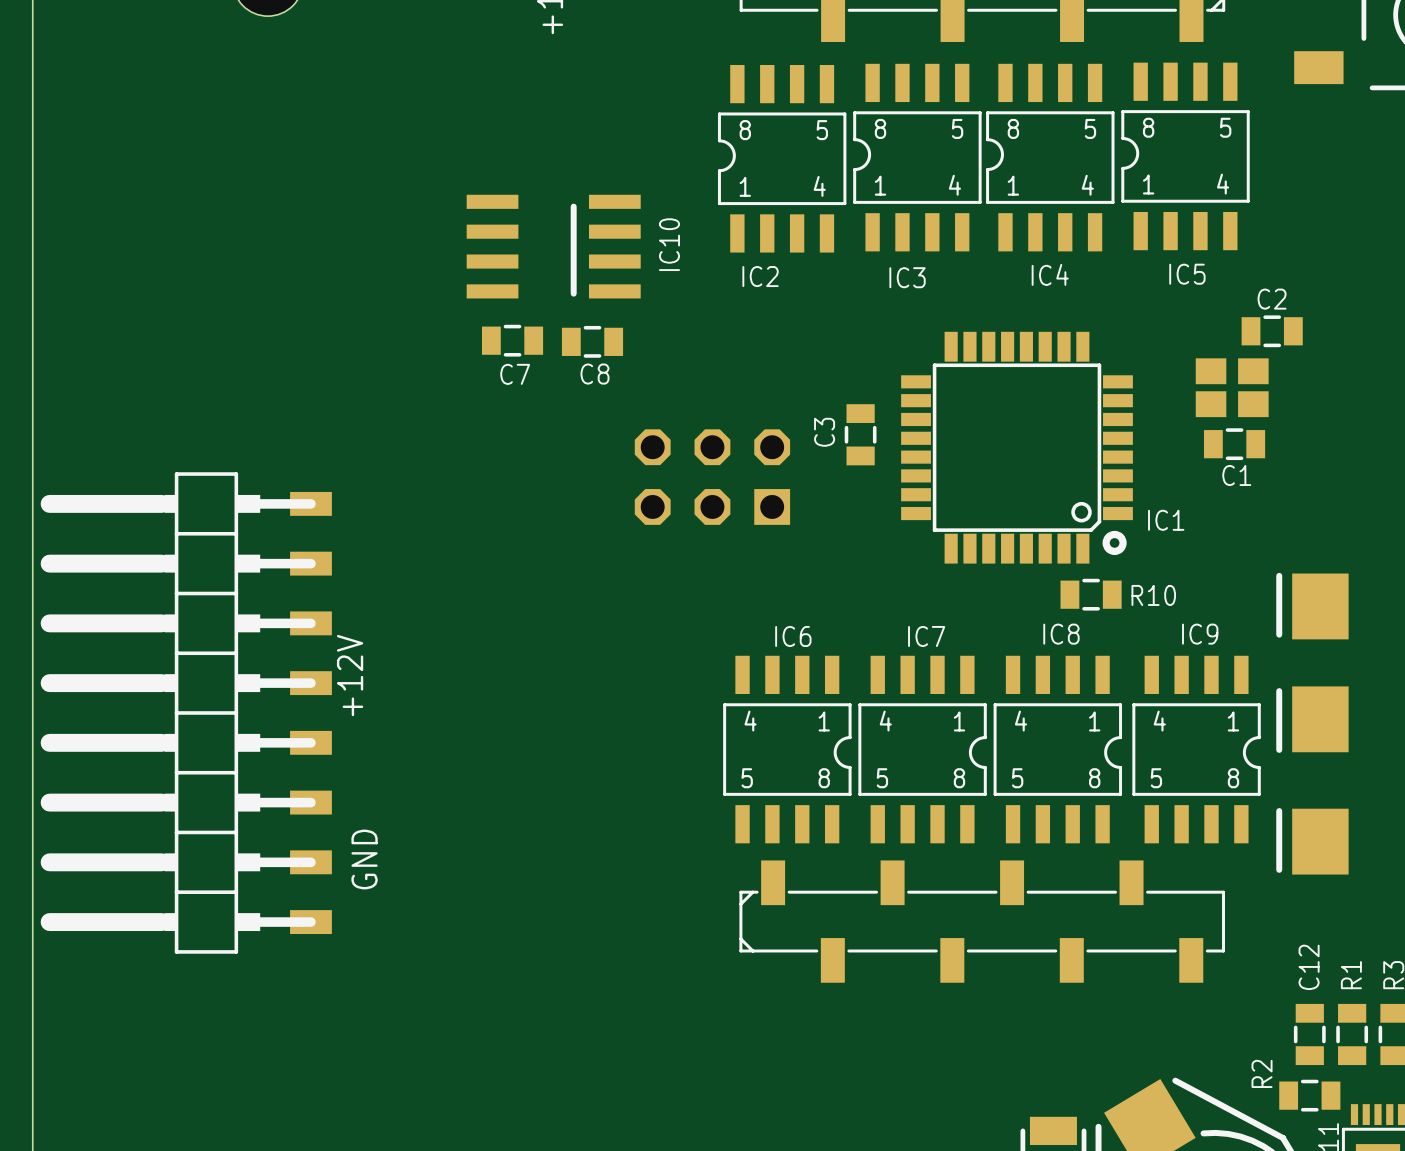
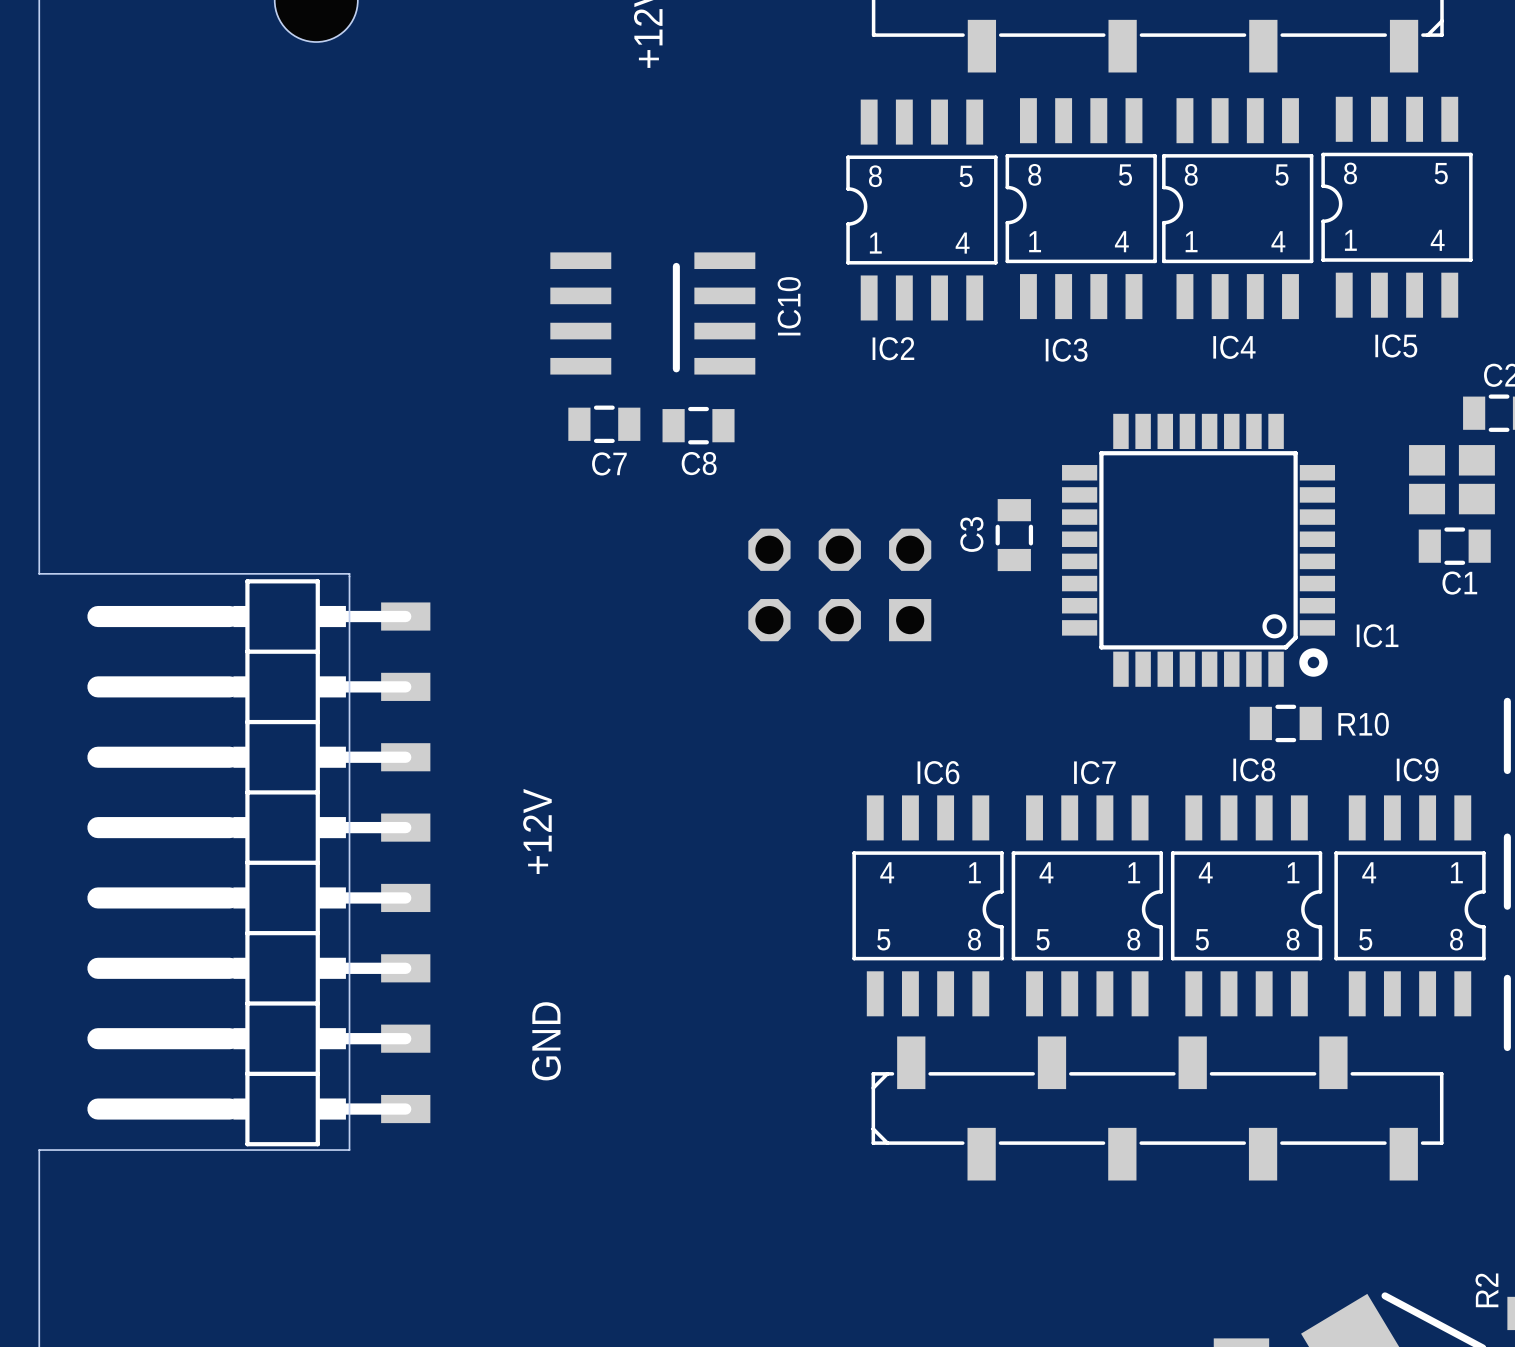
board edge: (32, 467) (32, 956) -> (39, 573) (349, 573) (349, 1150) (39, 1150)
text position: +12V (350, 675) -> +12V (537, 831)
part position: (186, 712) -> (258, 862)
text position: GND (364, 859) -> GND (546, 1041)

